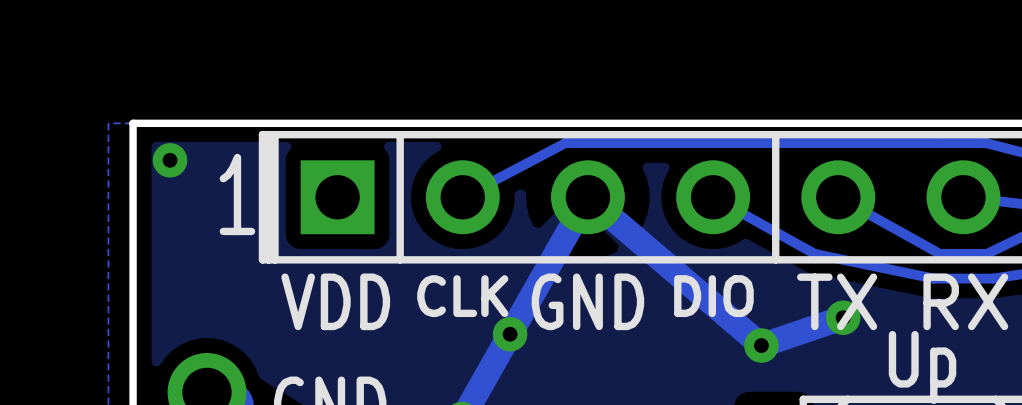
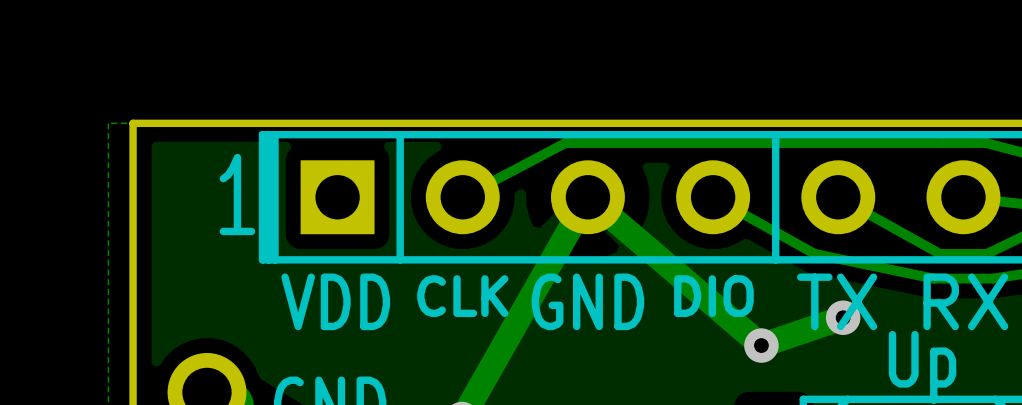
via: (170, 160) -> none
via: (510, 334) -> none

